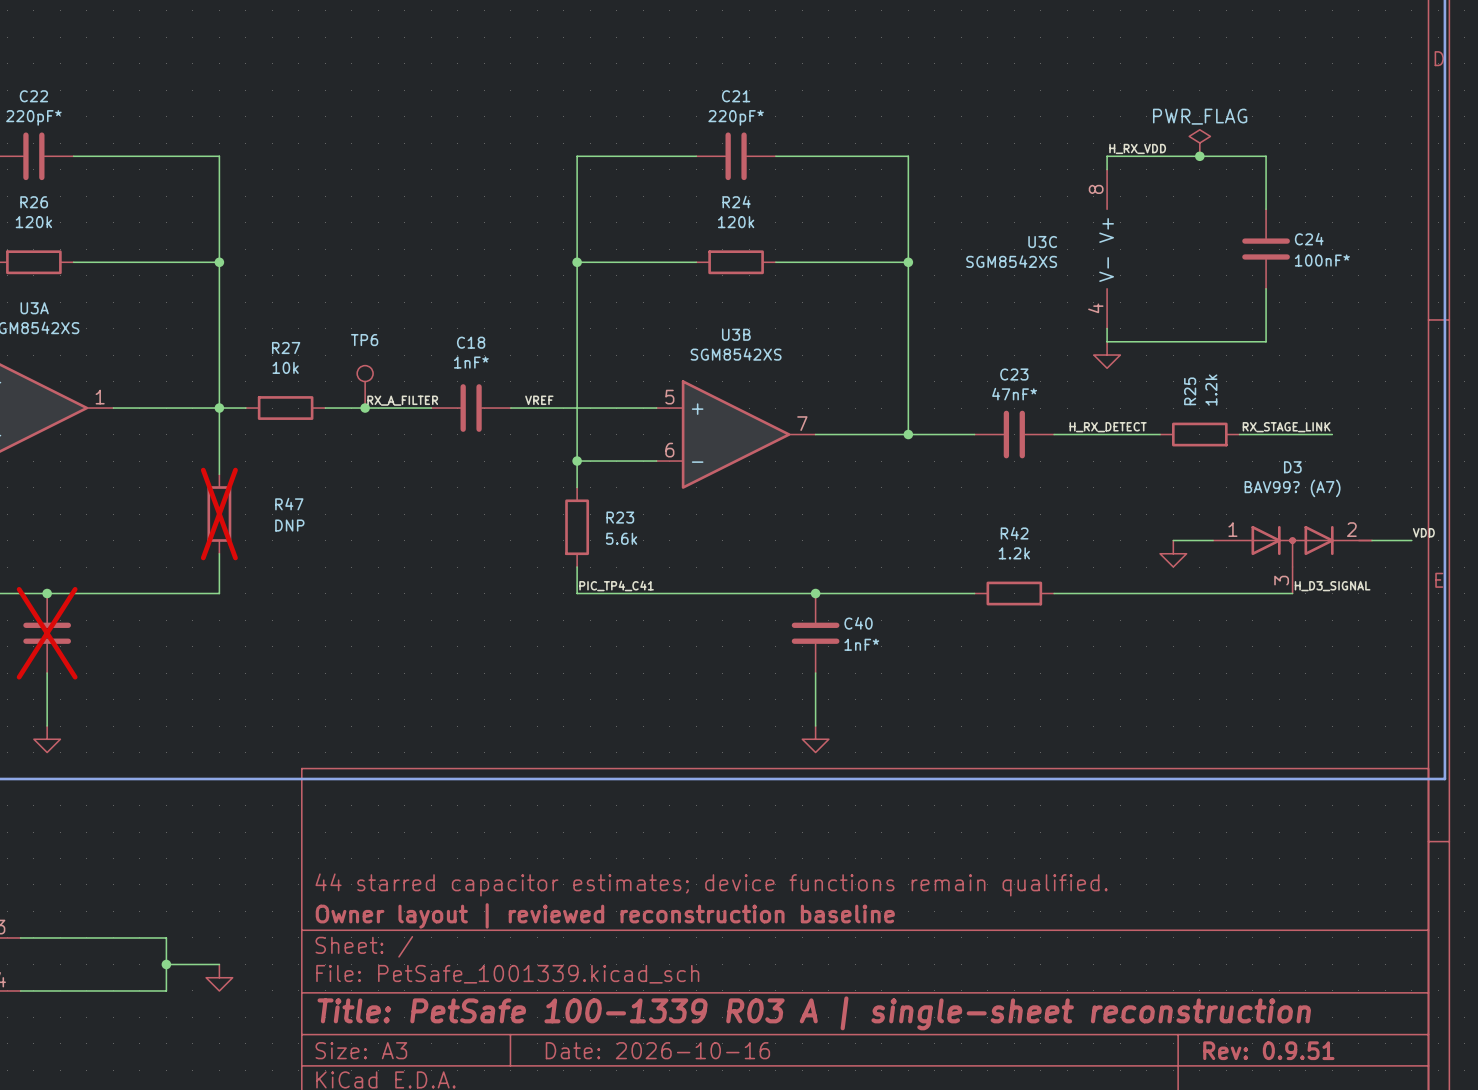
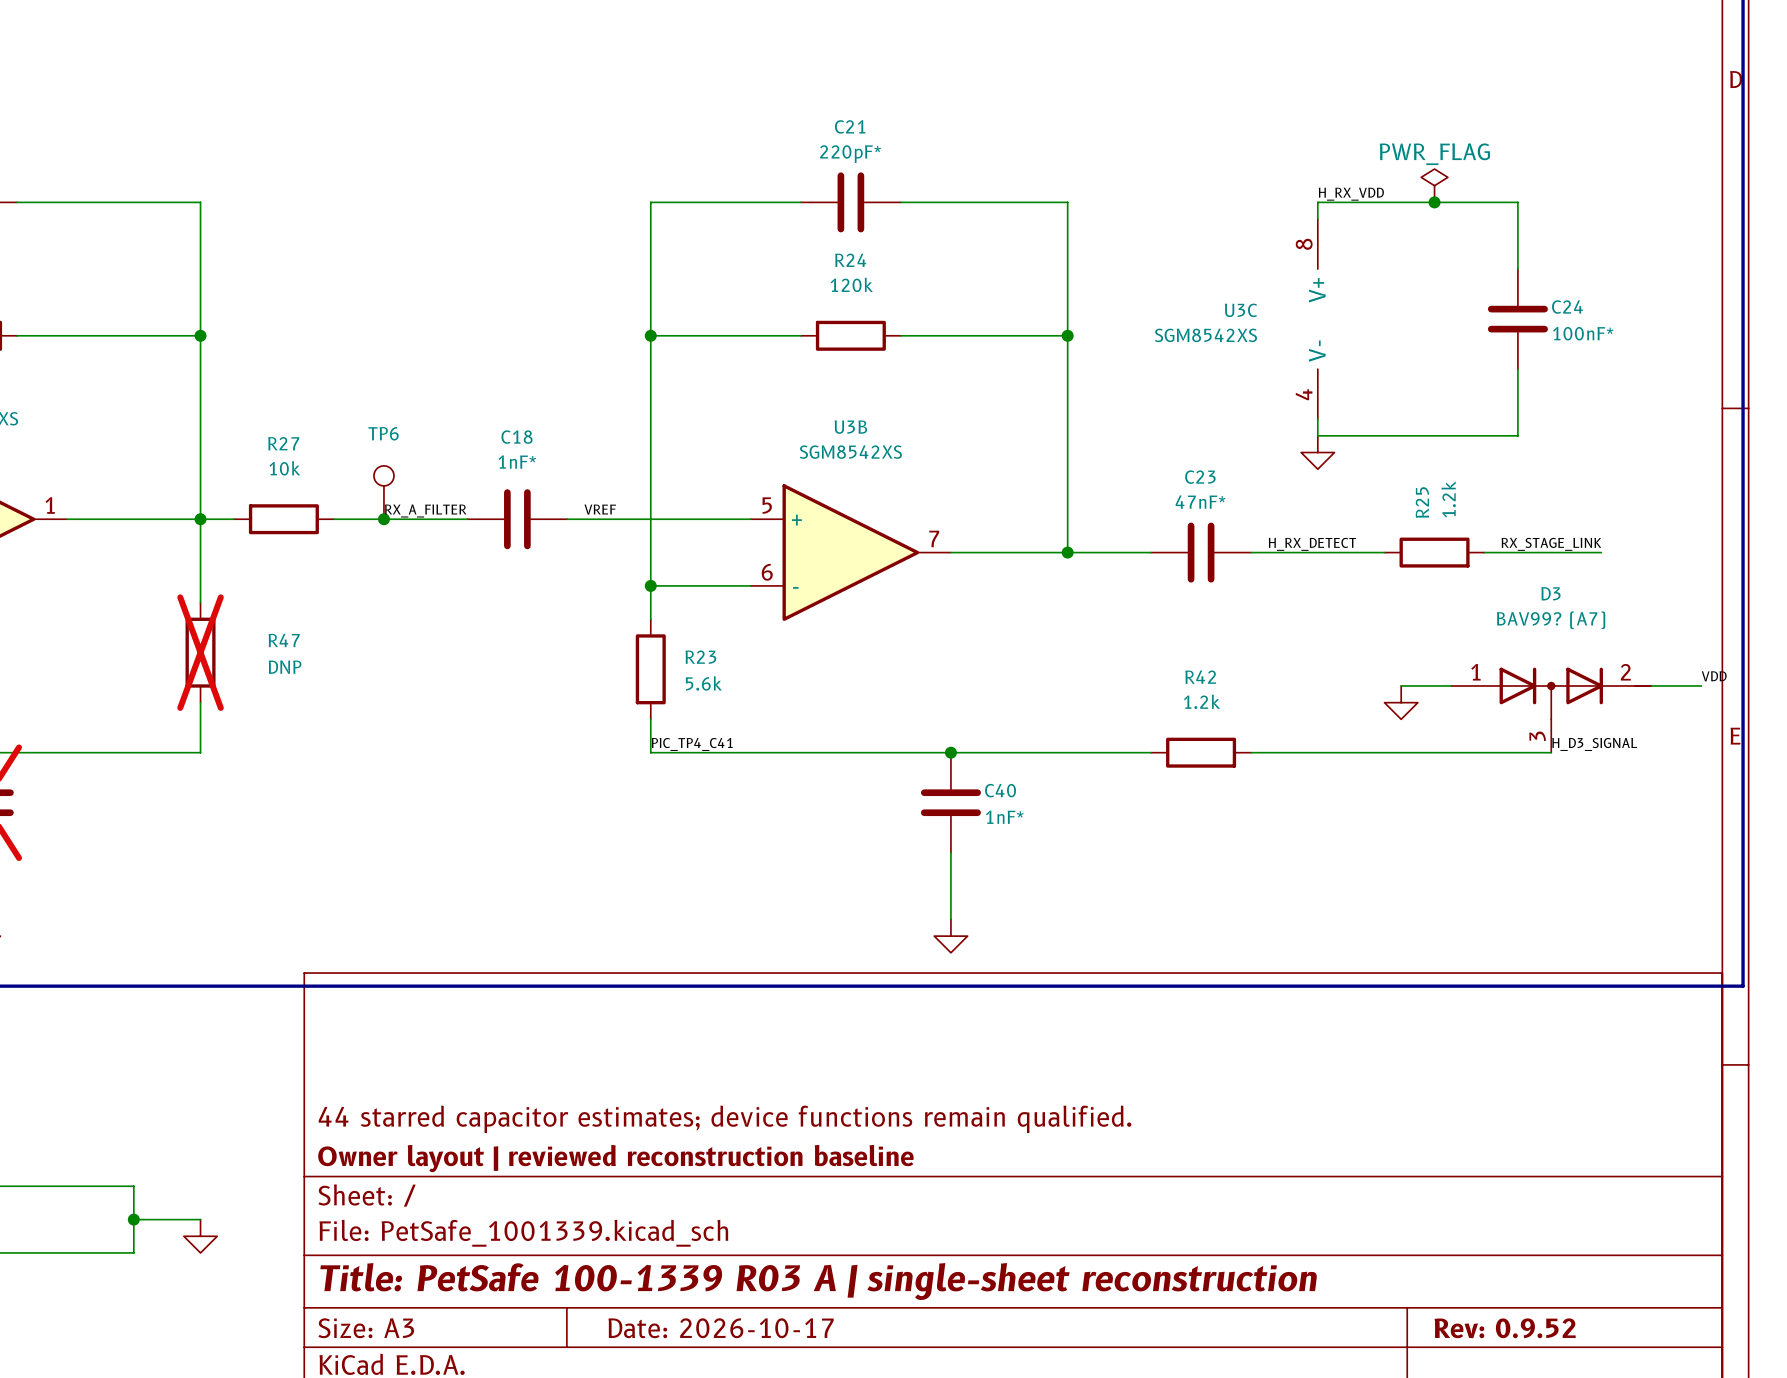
title block: Date: 2026-10-16 (657, 1050) -> Date: 2026-10-17 (721, 1328)
title block: Rev: 0.9.51 (1268, 1050) -> Rev: 0.9.52 (1505, 1328)

